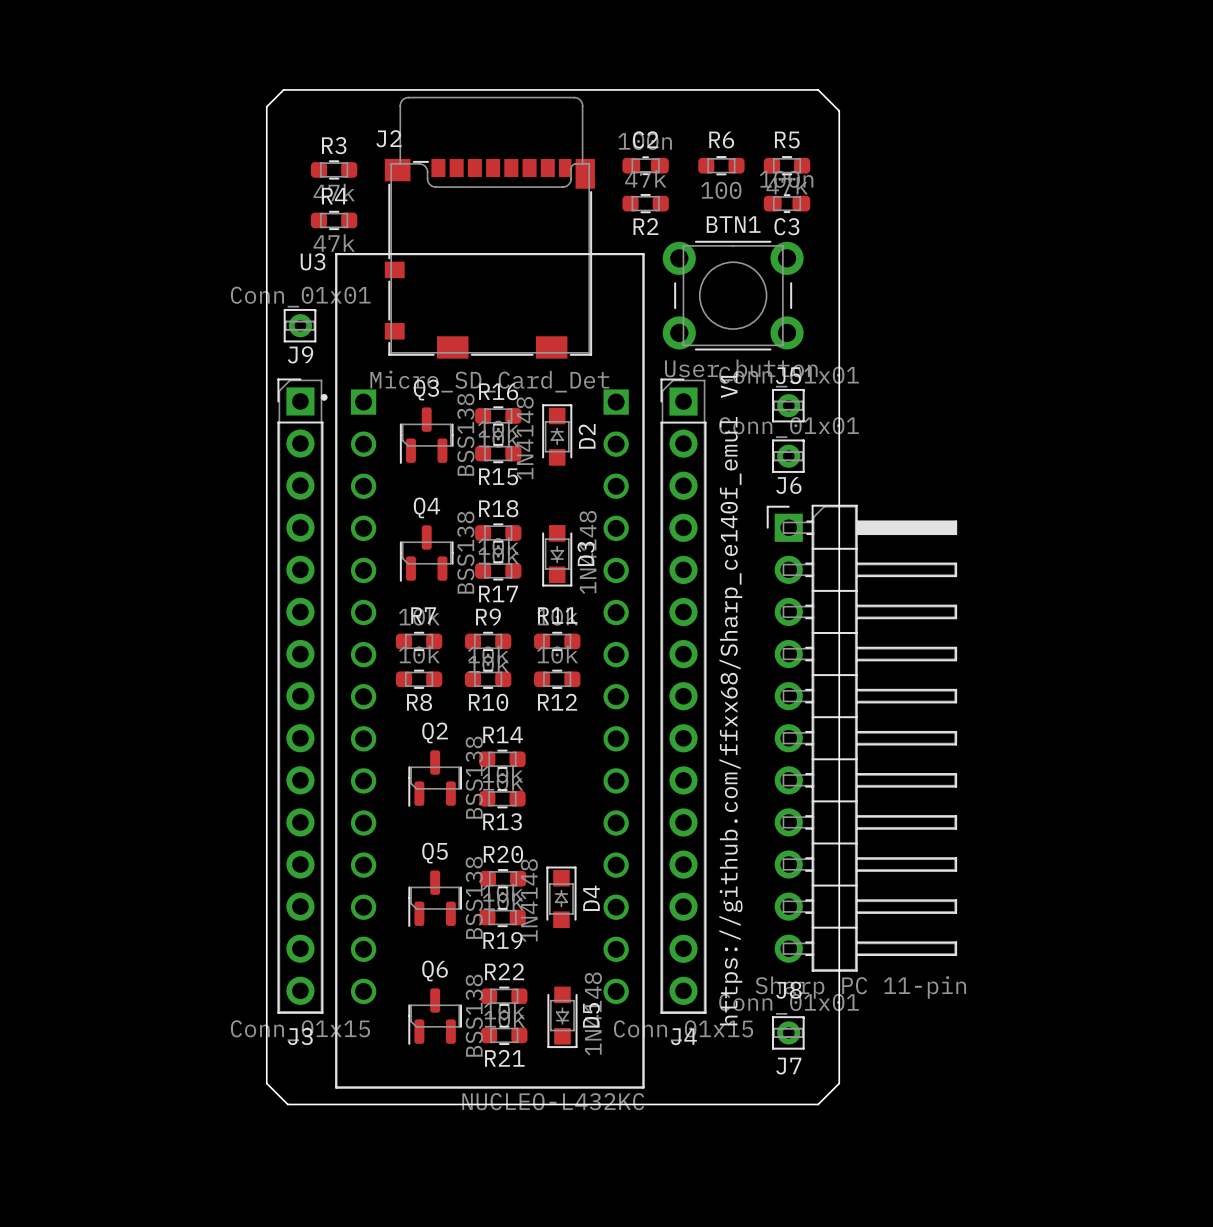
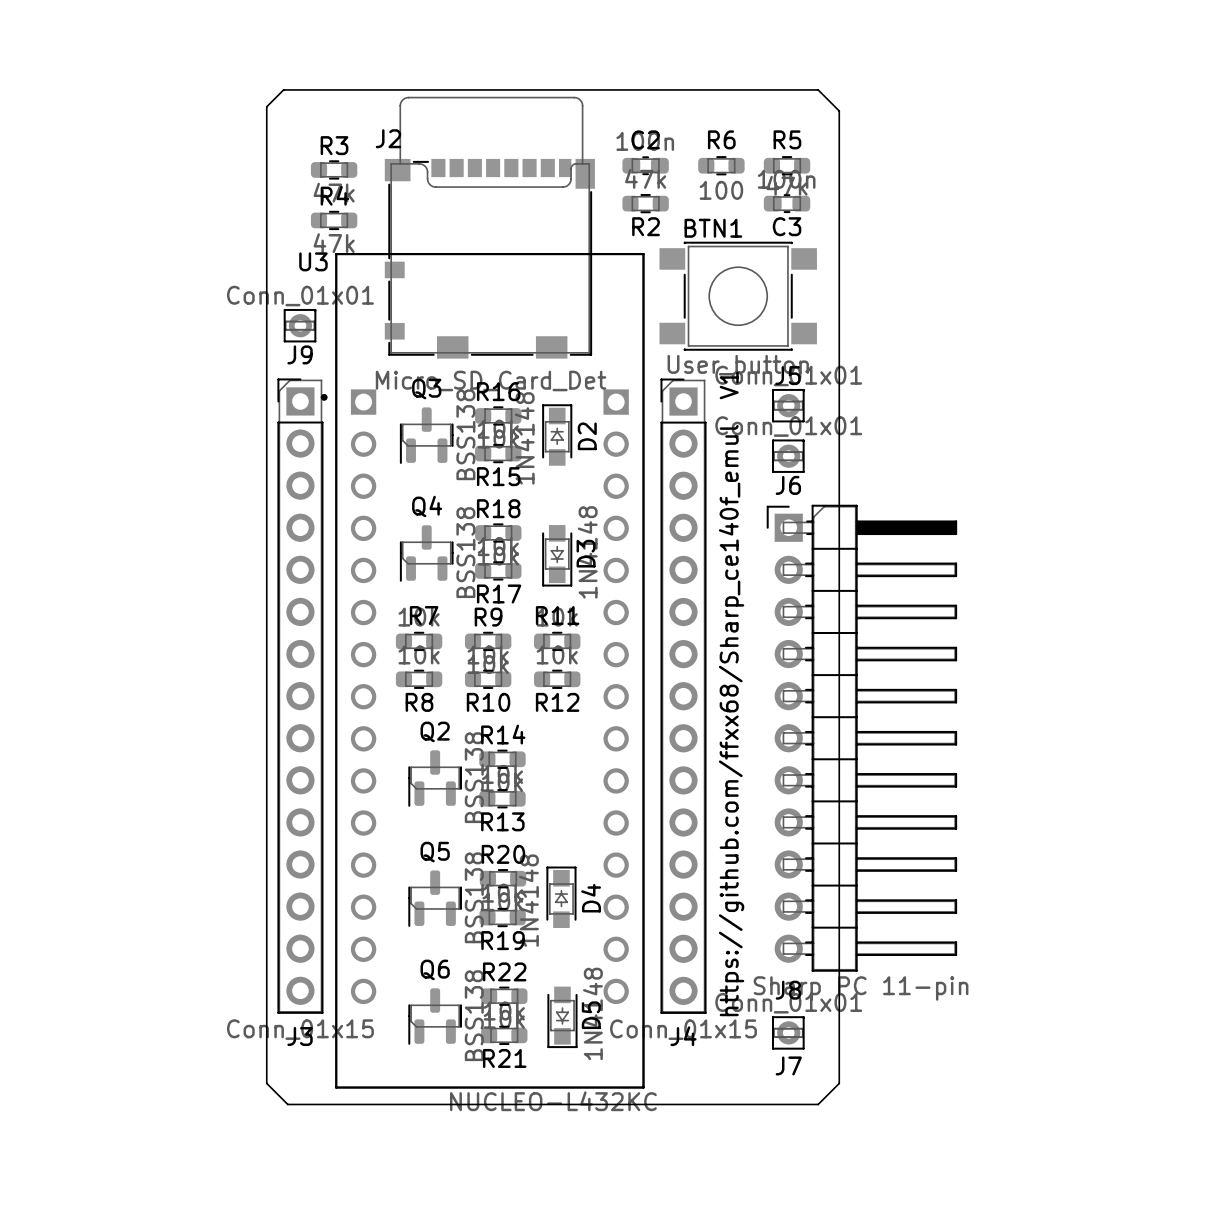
BTN1 footprint: [662, 240, 804, 351] -> [659, 241, 817, 351]

